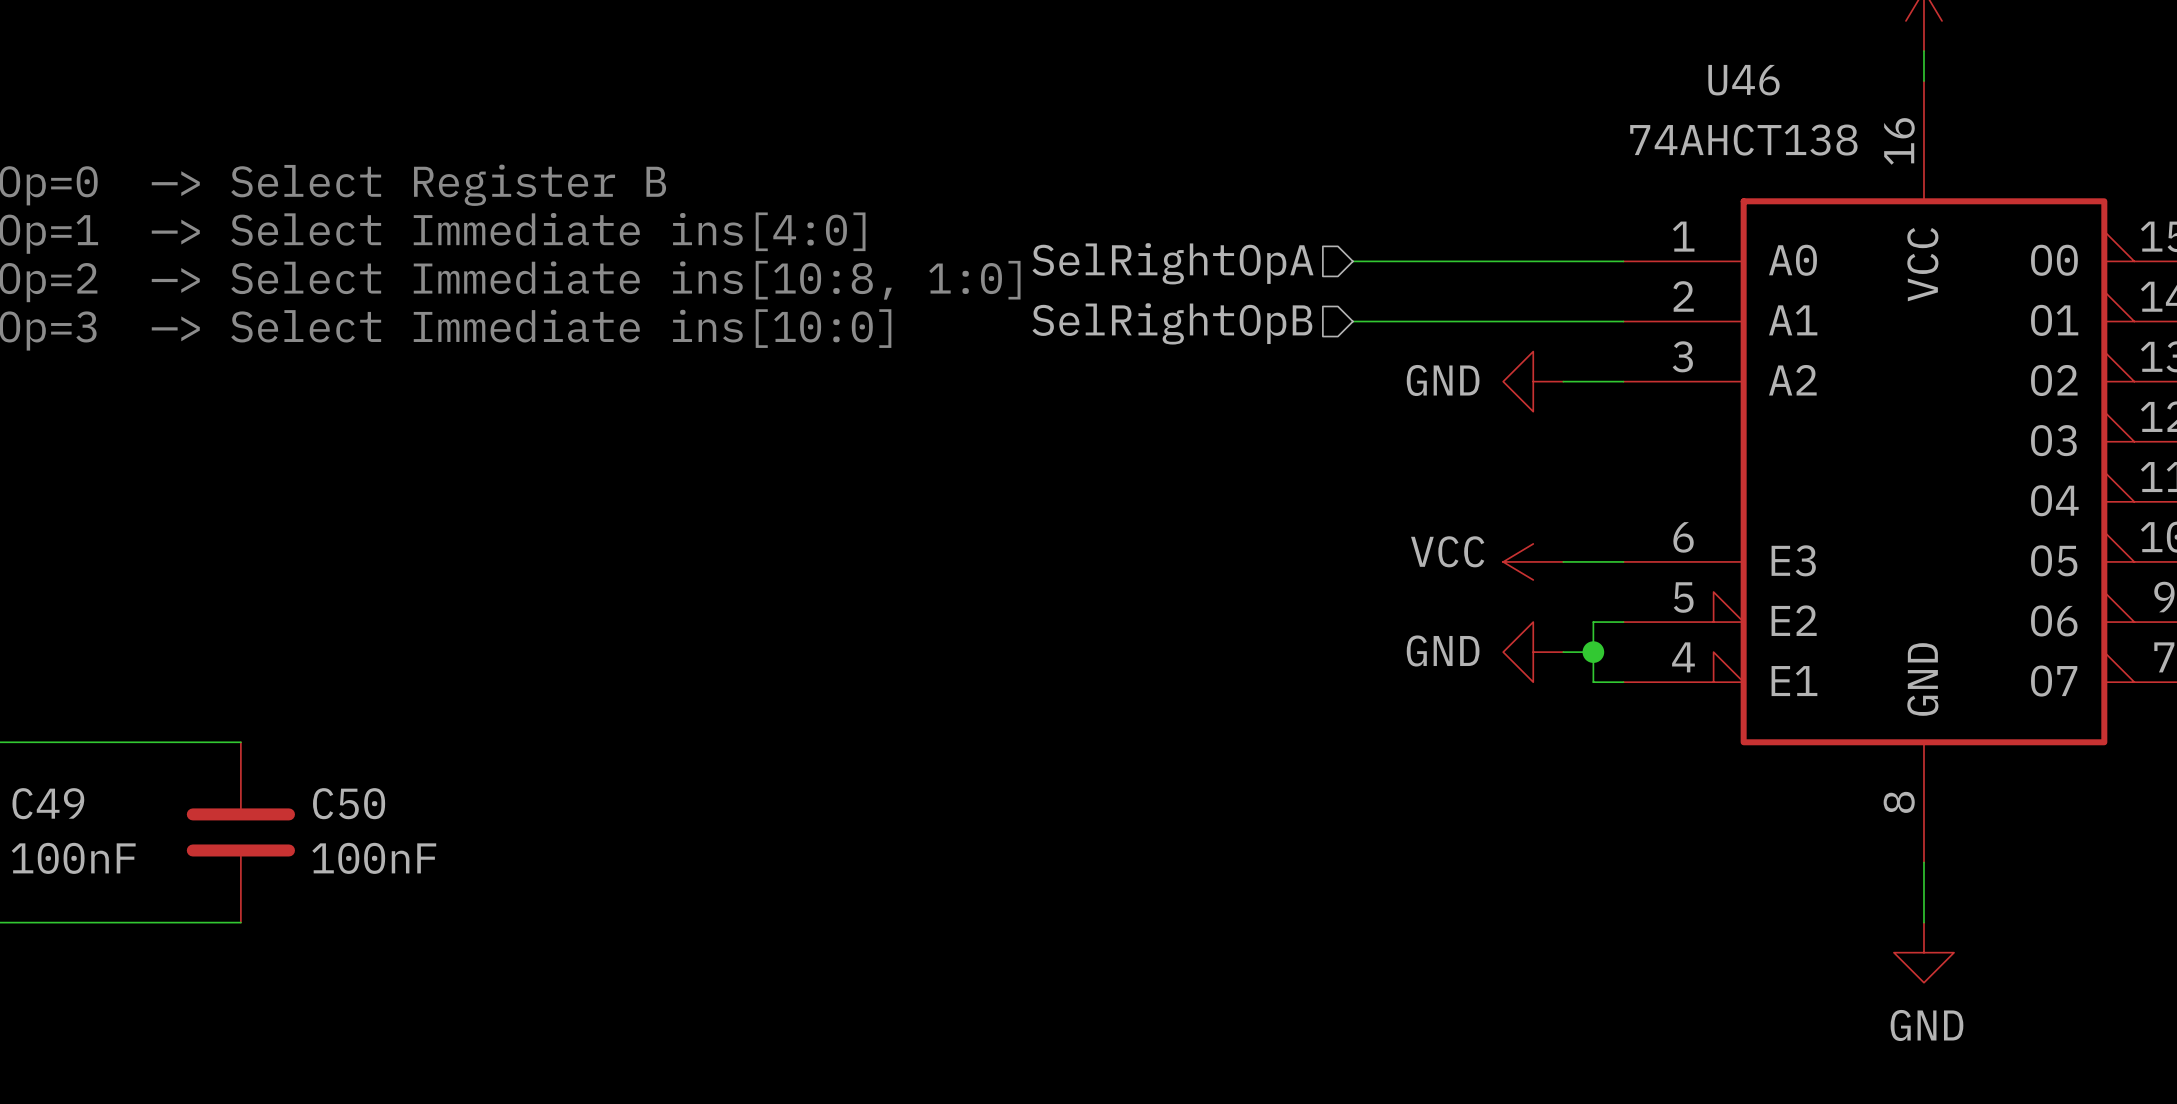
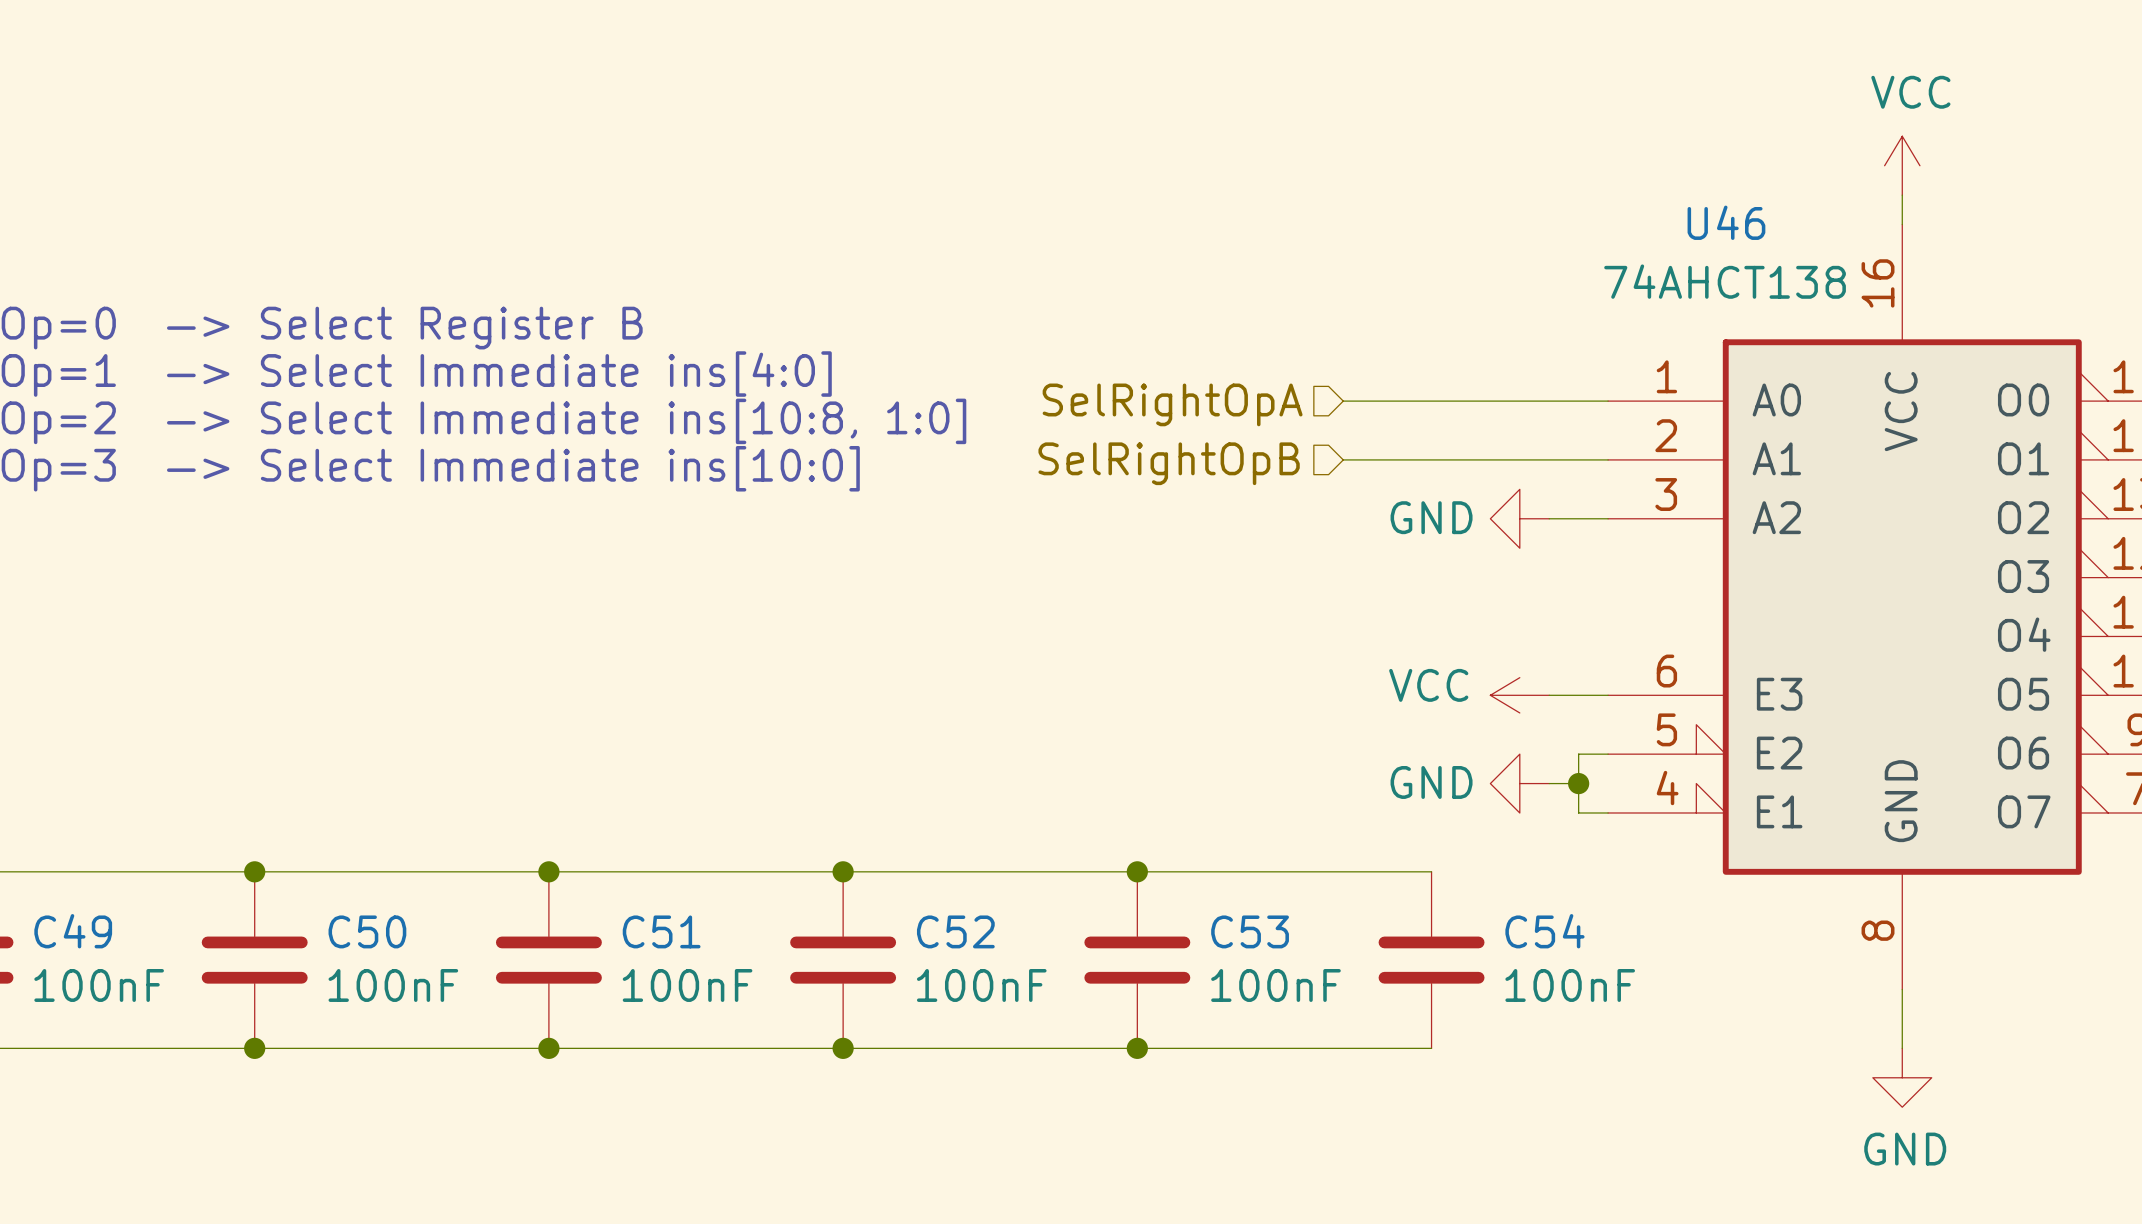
wire: none -> (254, 871) (1431, 871)
junction: none -> (254, 871)
junction: none -> (548, 871)
junction: none -> (843, 871)
junction: none -> (1137, 871)
C51: none -> 100nF (548, 960)
C52: none -> 100nF (843, 960)
C53: none -> 100nF (1137, 960)
C54: none -> 100nF (1431, 960)
wire: none -> (254, 1048) (1431, 1048)
junction: none -> (254, 1048)
junction: none -> (548, 1048)
junction: none -> (843, 1048)
junction: none -> (1137, 1048)

